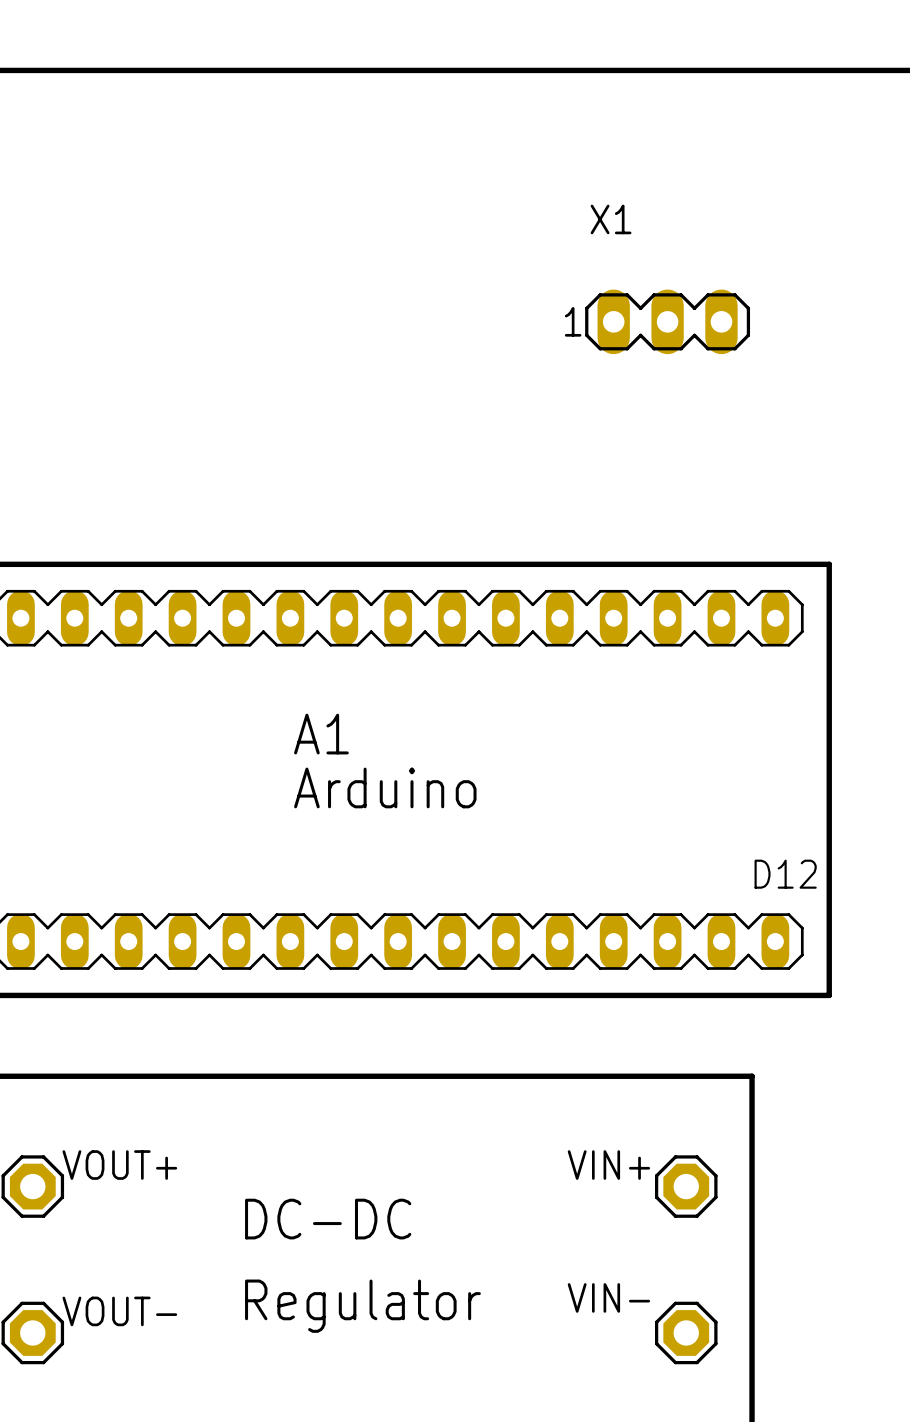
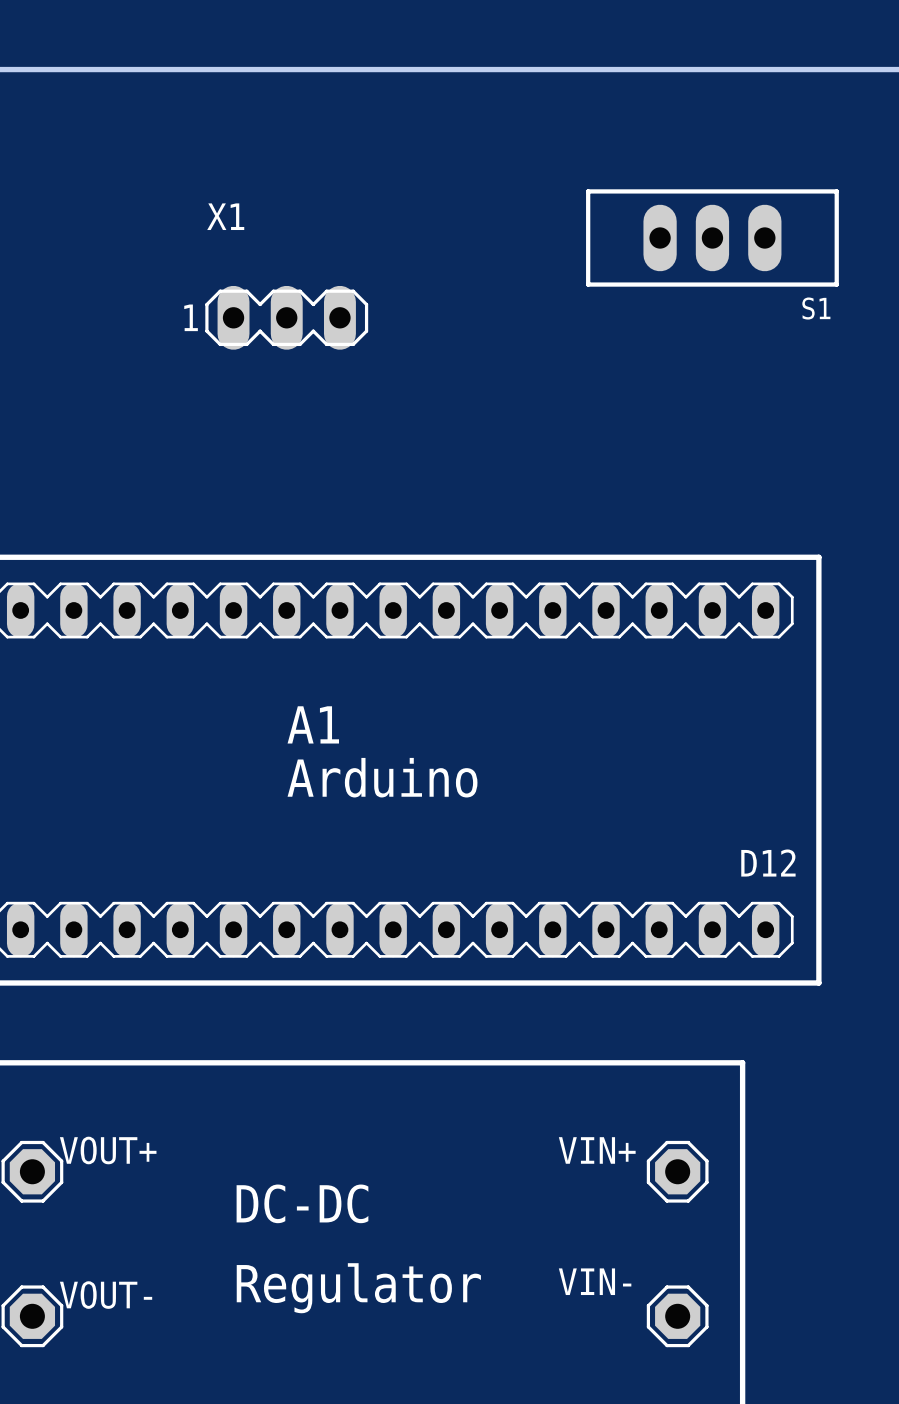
S1: none -> (712, 237)
X1 position: (667, 321) -> (286, 317)

